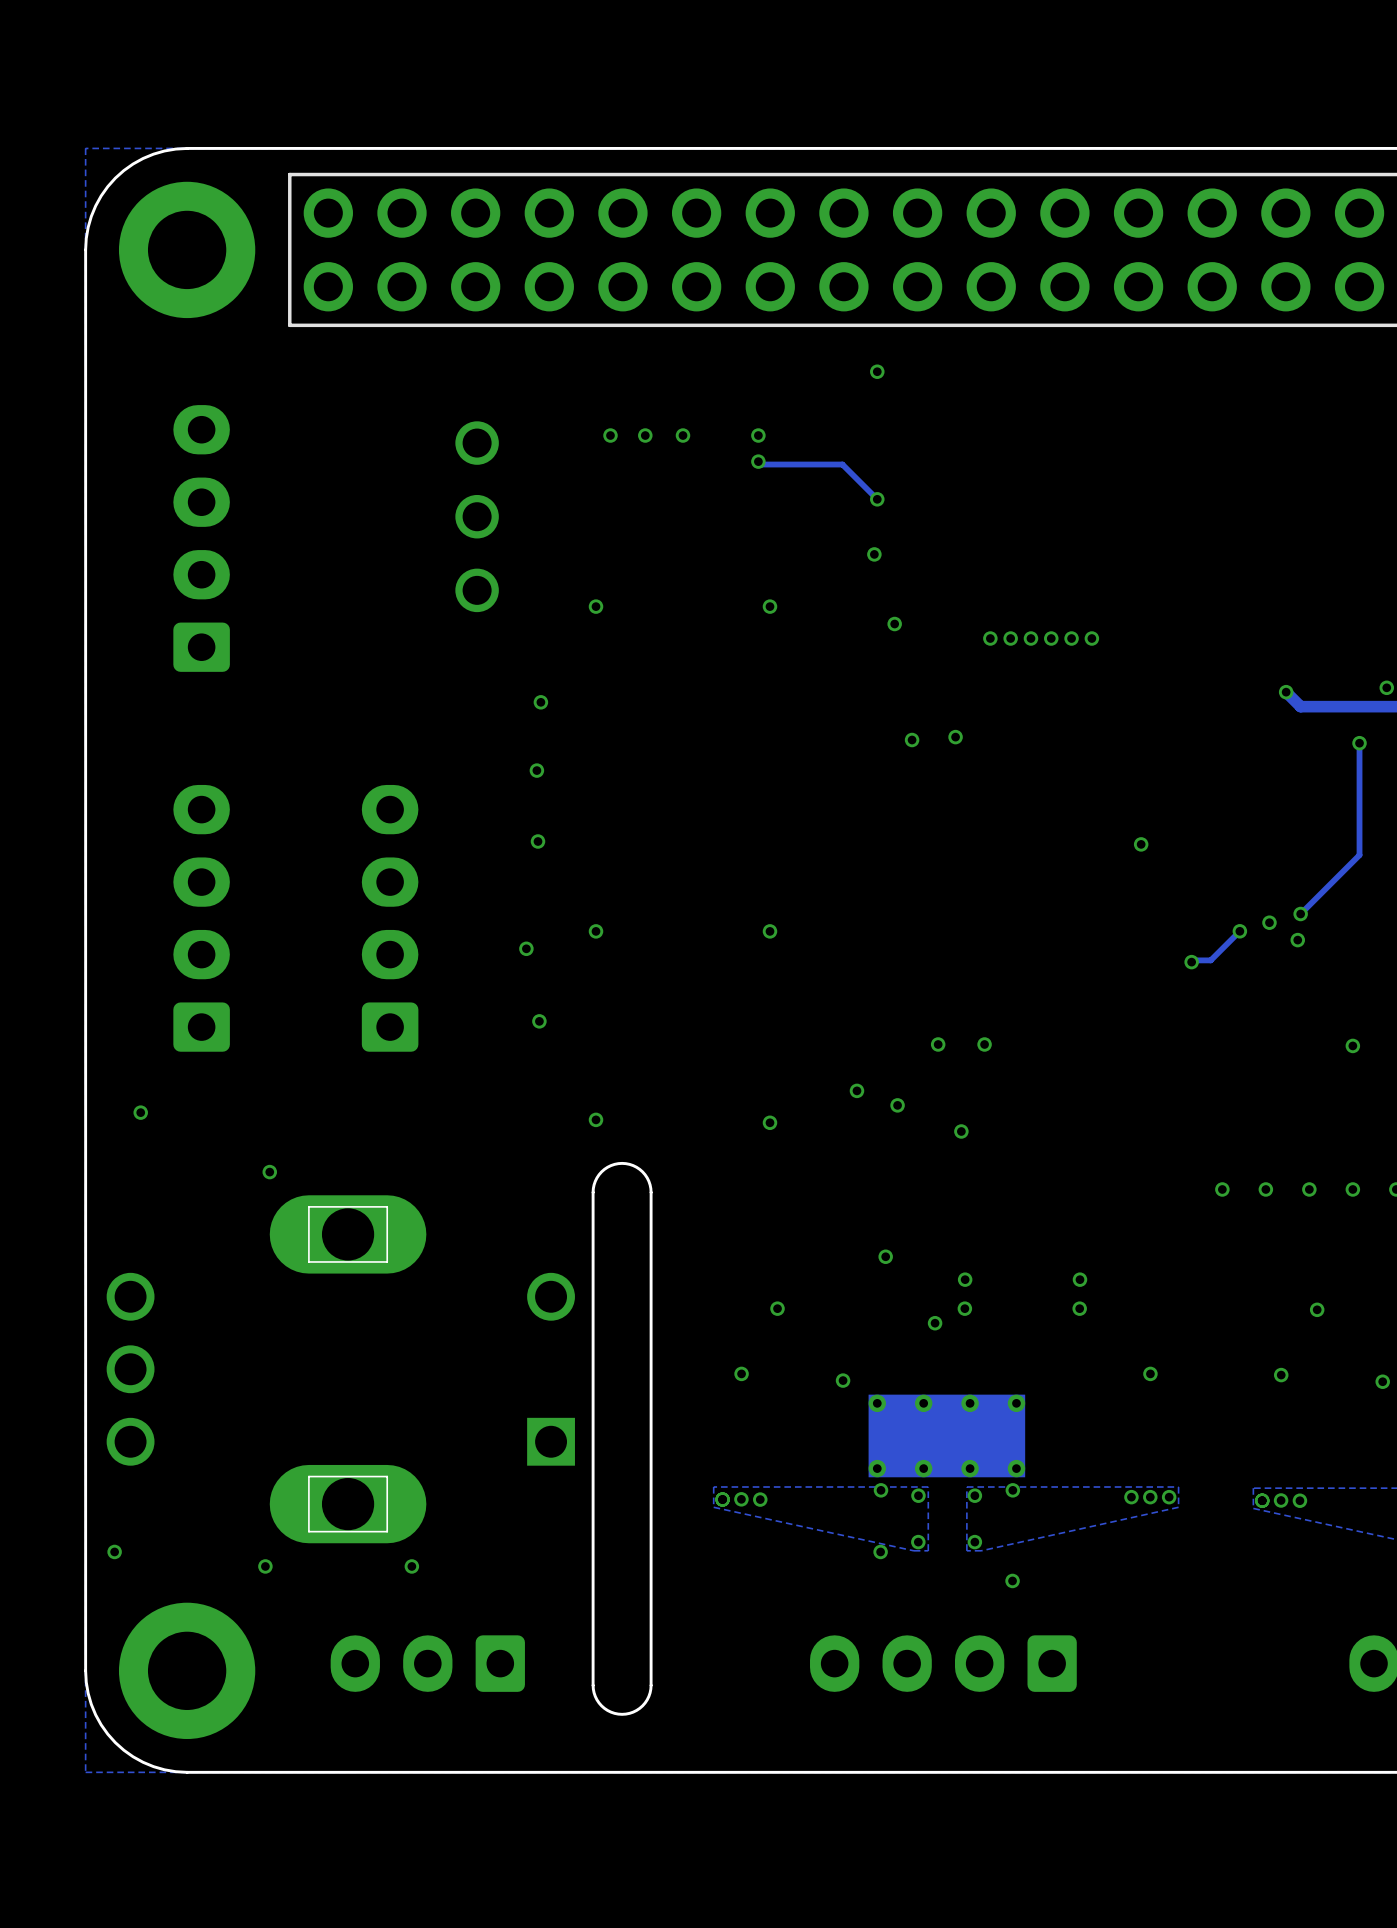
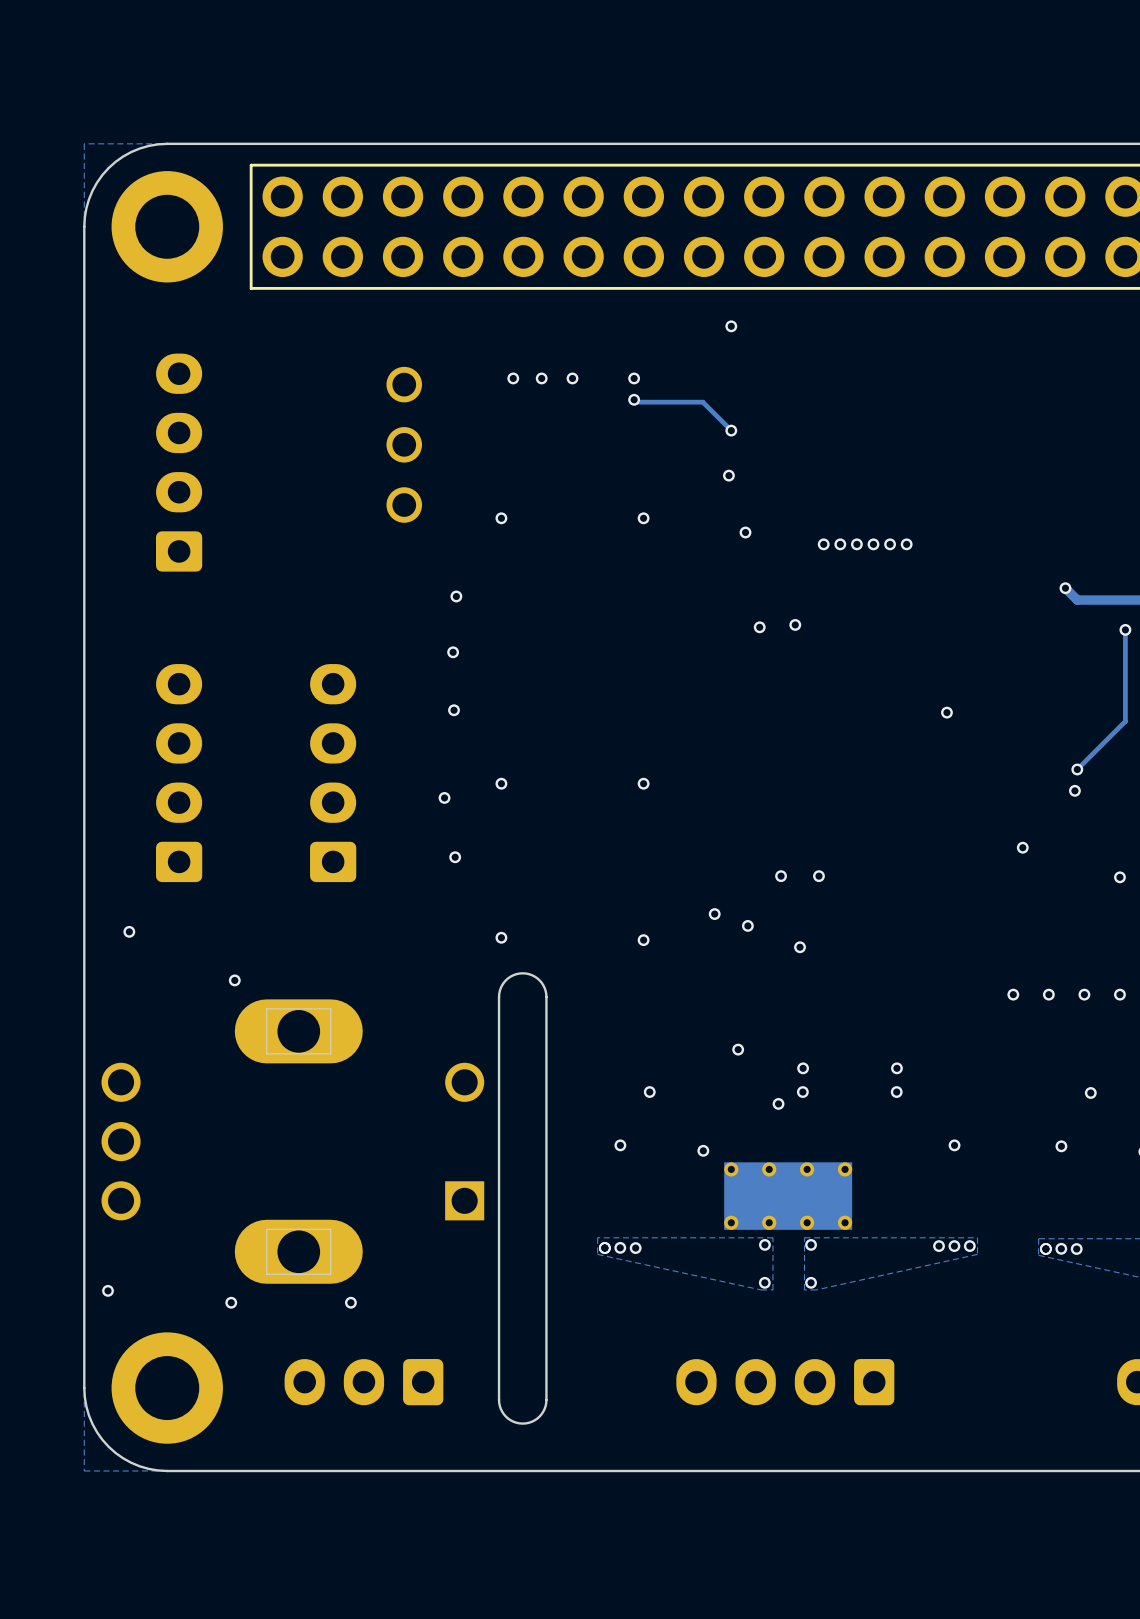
via: (1269, 922) -> none
track: (1239, 931) (1210, 960) (1193, 960) (1191, 962) -> none
via: (1239, 931) -> none
via: (1191, 962) -> none
via: none -> (1022, 847)
via: (881, 1490) -> none
via: (1012, 1490) -> none
via: (880, 1551) -> none
via: (1012, 1580) -> none

